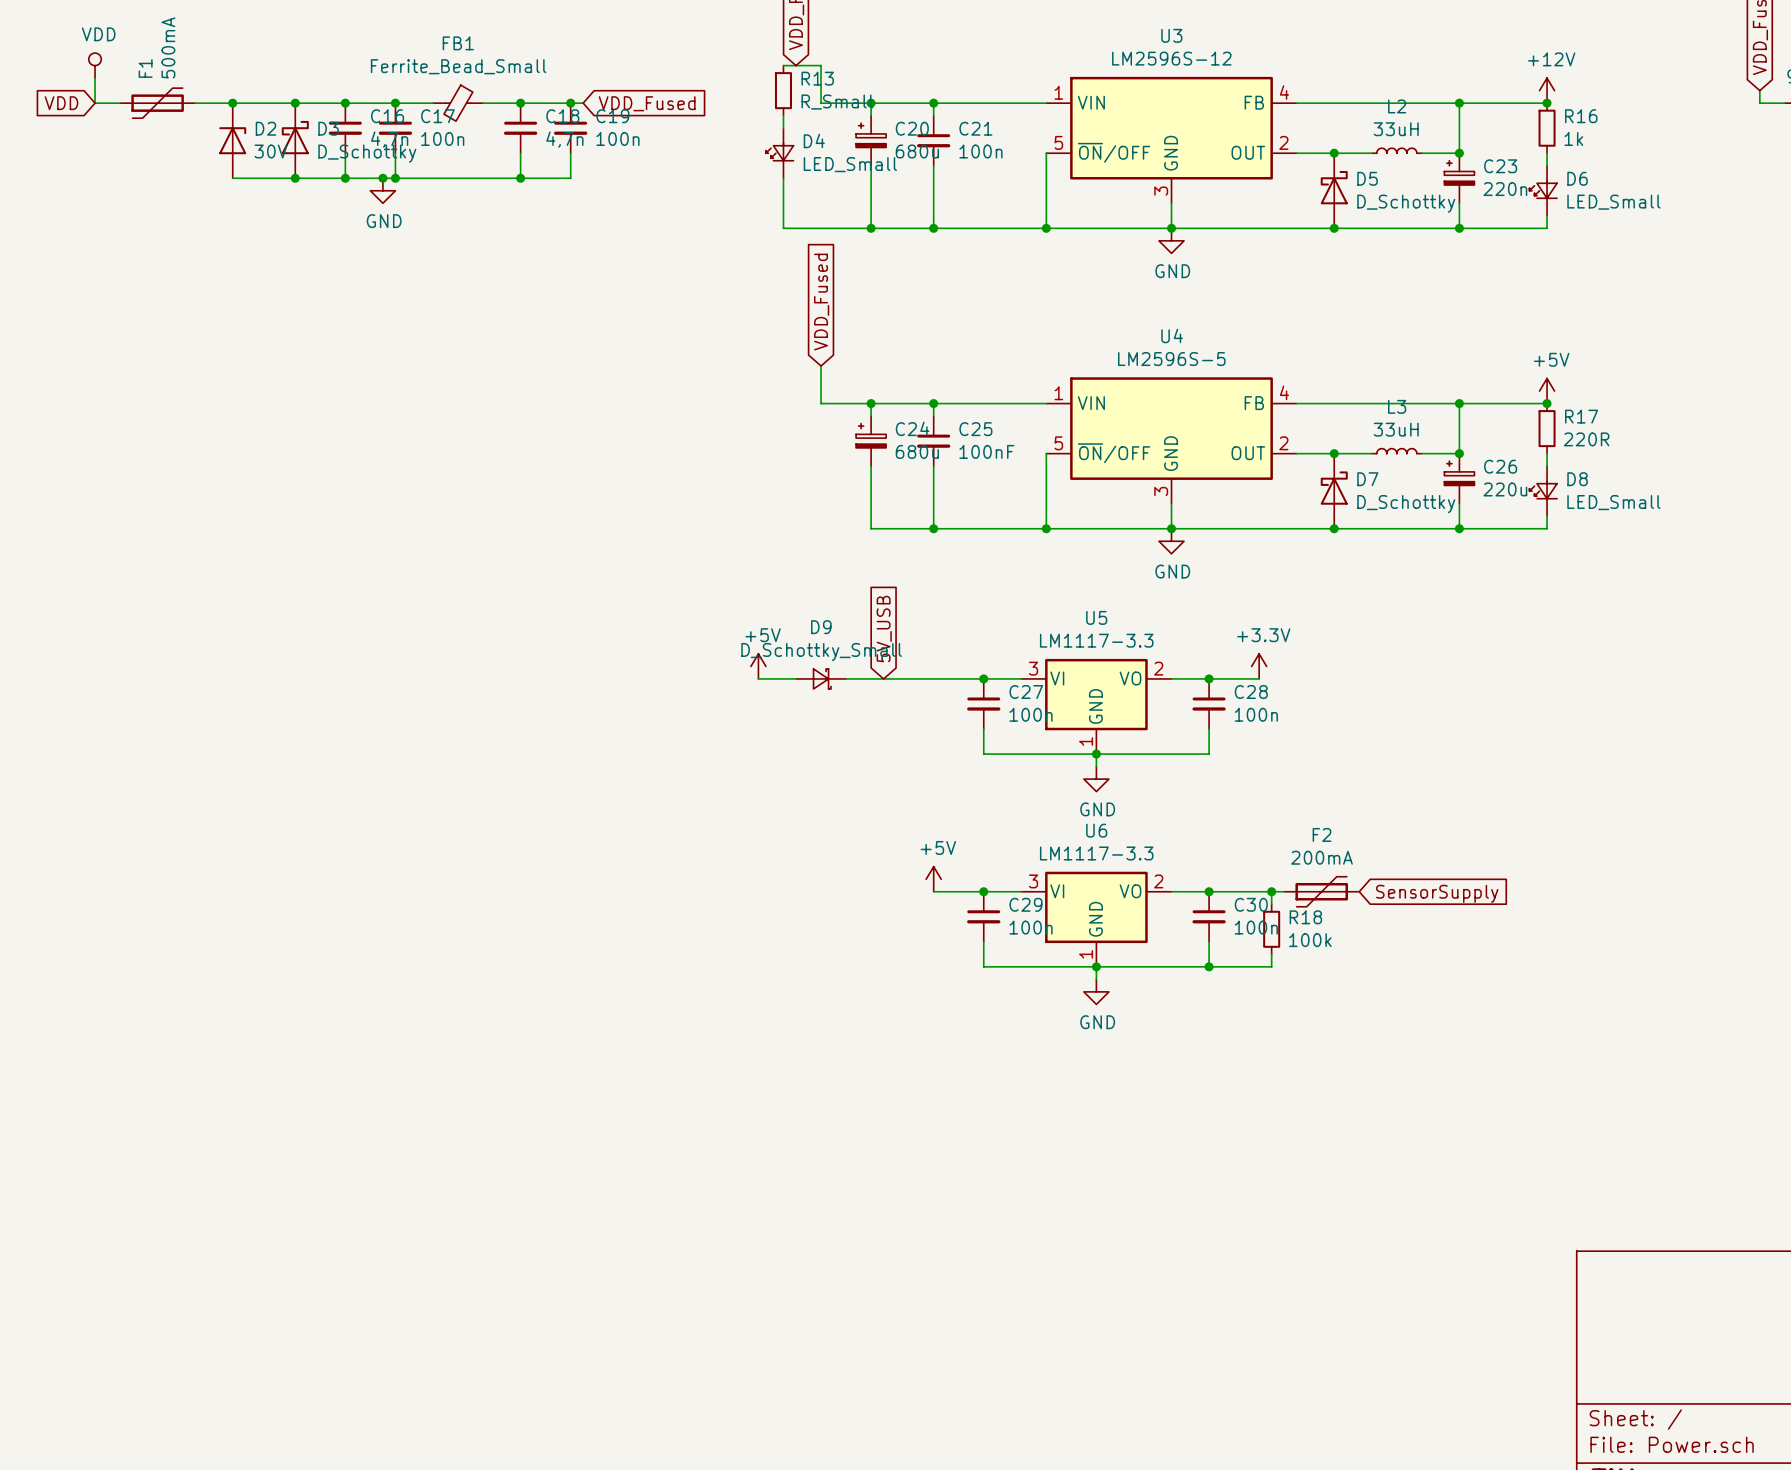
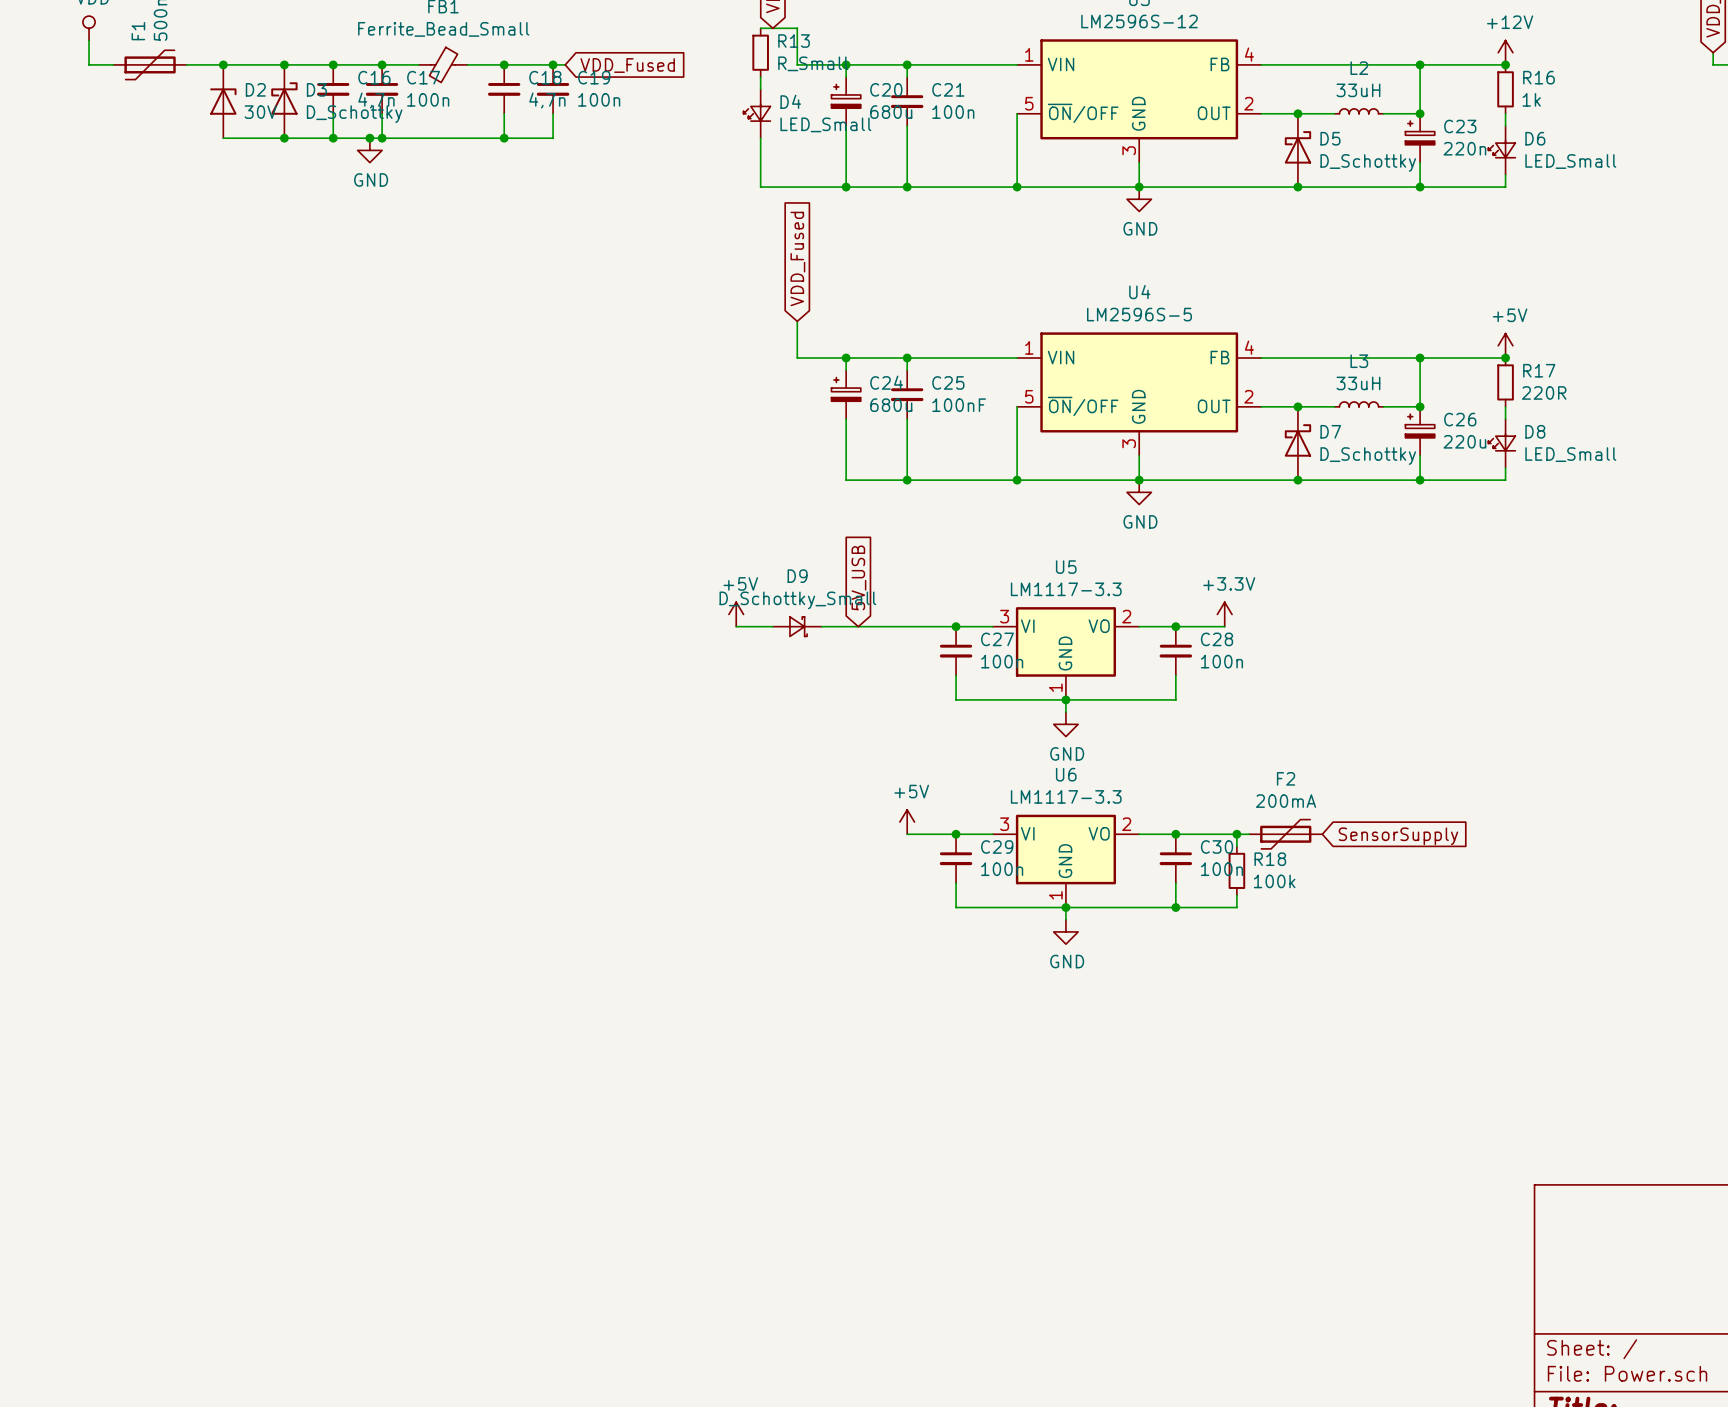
global label: VDD (61, 103) -> none

